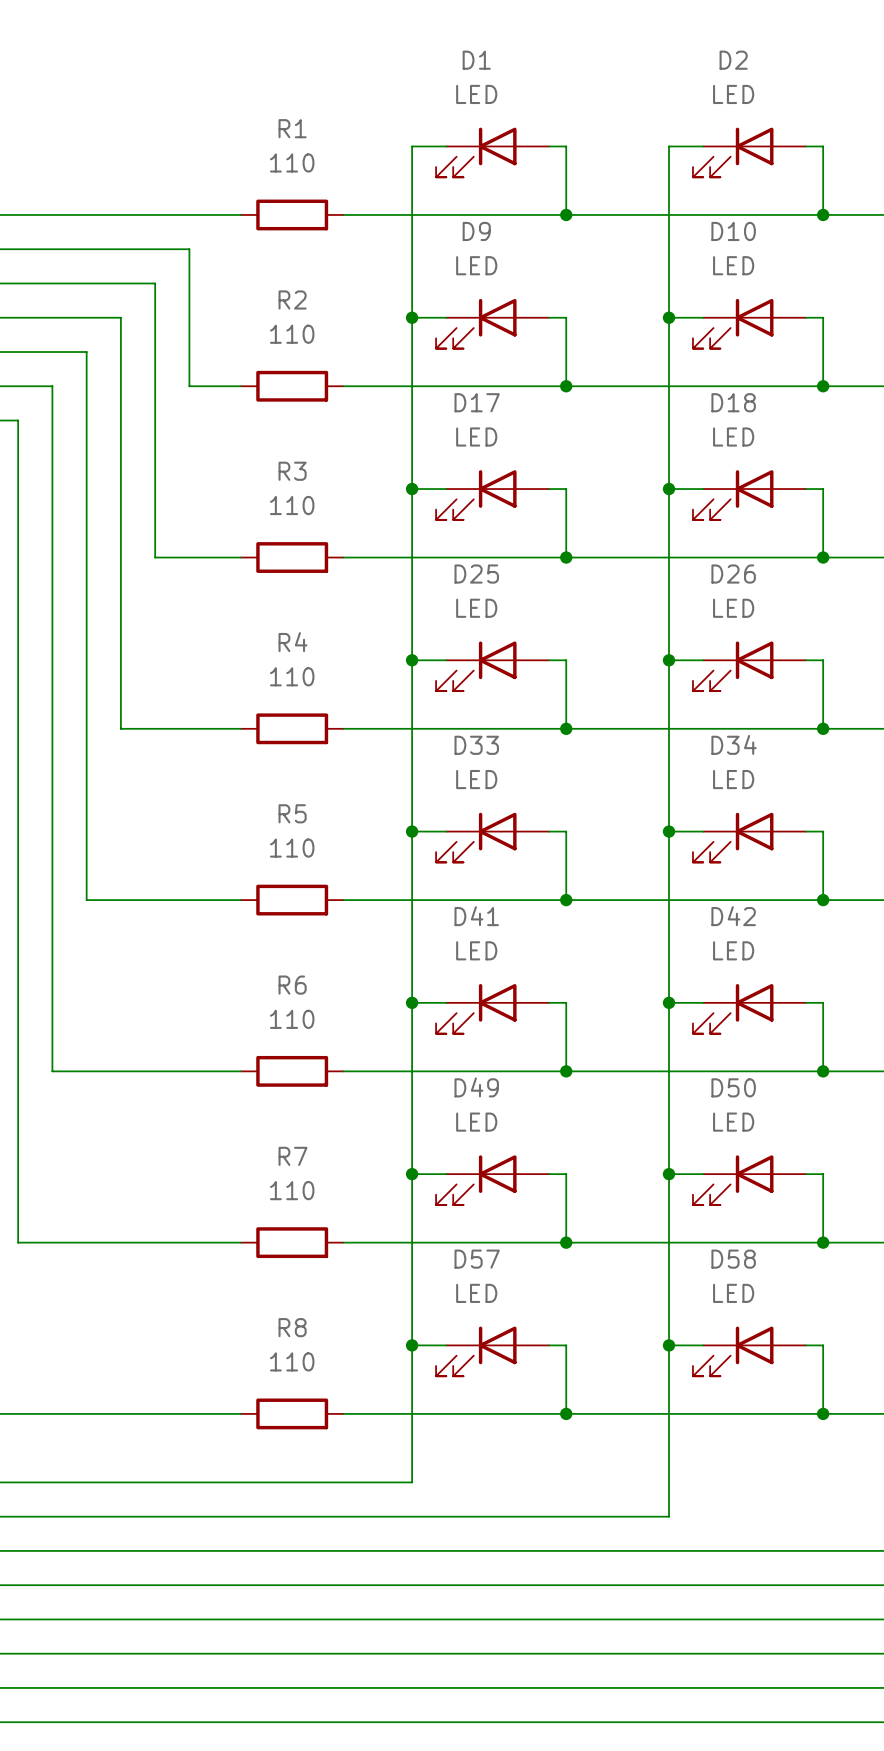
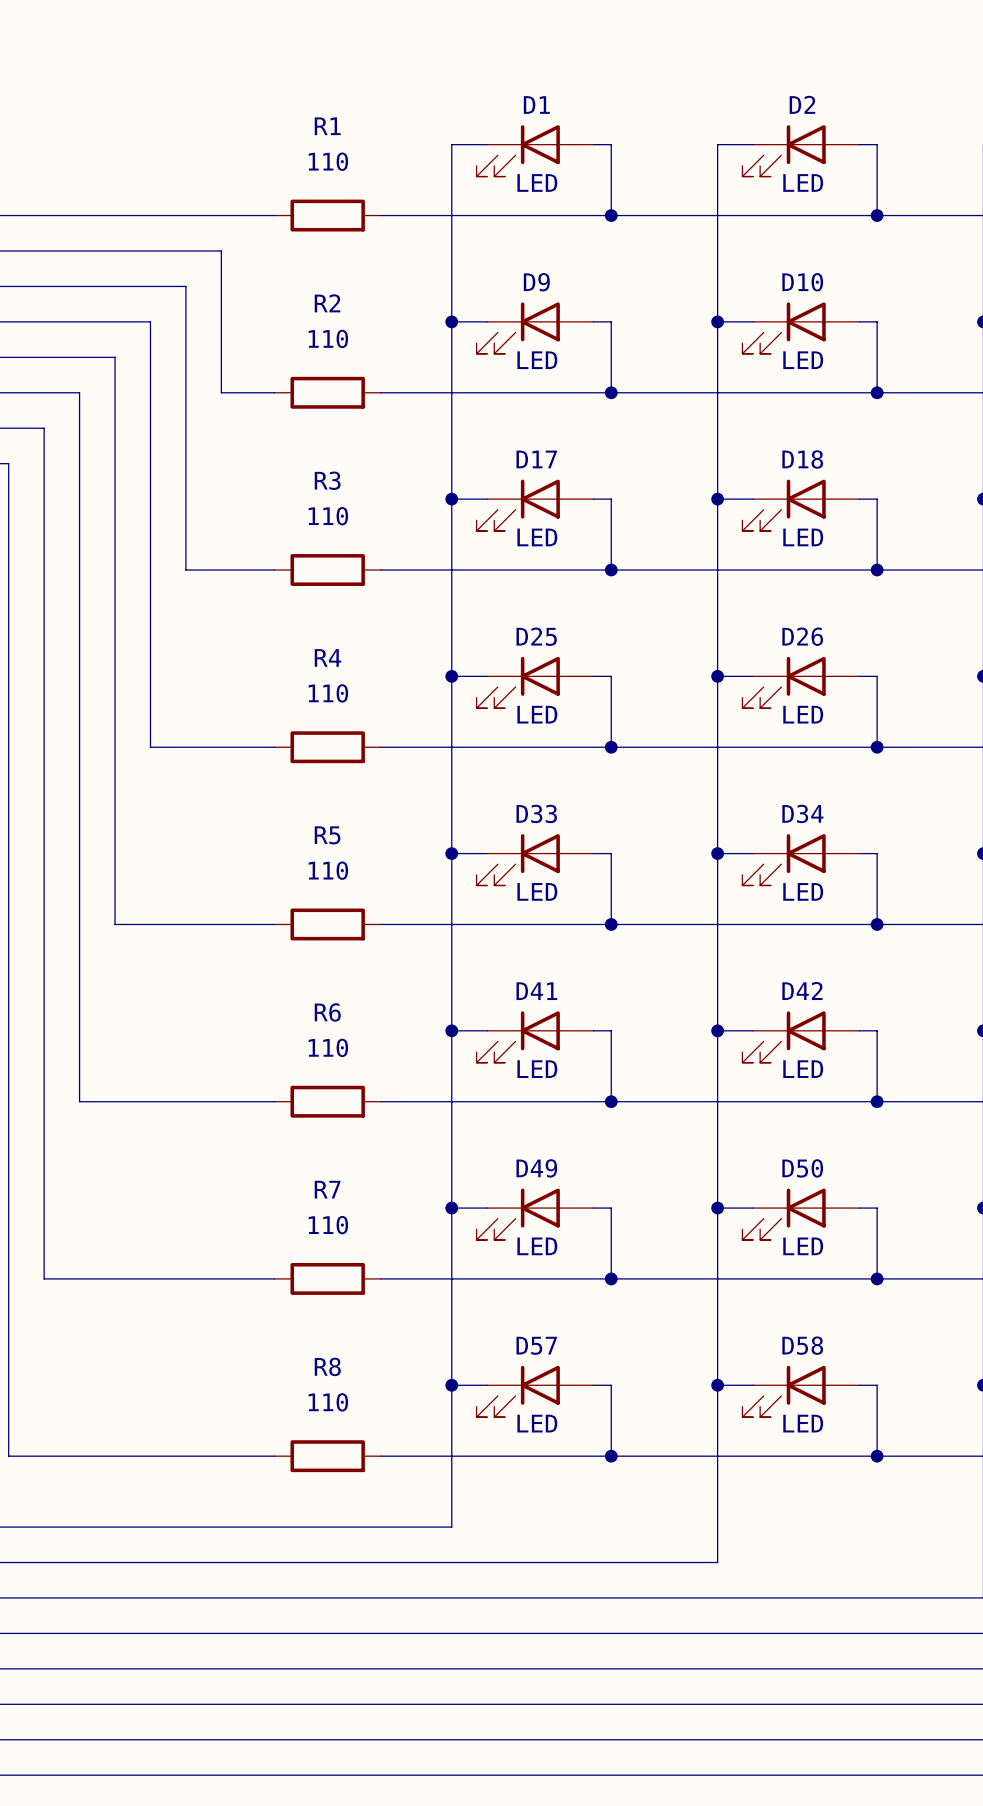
D1 name position: D1 (476, 60) -> D1 (536, 105)
D2 name position: D2 (733, 60) -> D2 (802, 104)
D1 value position: LED (476, 94) -> LED (537, 182)
D2 value position: LED (733, 94) -> LED (803, 182)
D9 name position: D9 (476, 231) -> D9 (536, 282)
D10 name position: D10 (733, 231) -> D10 (802, 282)
D9 value position: LED (476, 265) -> LED (537, 360)
D10 value position: LED (733, 265) -> LED (803, 360)
D17 name position: D17 (477, 402) -> D17 (536, 459)
D18 name position: D18 (733, 402) -> D18 (802, 459)
D17 value position: LED (476, 437) -> LED (537, 537)
D18 value position: LED (733, 437) -> LED (803, 537)
D25 name position: D25 (476, 574) -> D25 (536, 636)
D26 name position: D26 (733, 574) -> D26 (802, 636)
D25 value position: LED (476, 608) -> LED (537, 714)
D26 value position: LED (733, 608) -> LED (803, 714)
D34 name position: D34 (734, 744) -> D34 (802, 813)
D33 name position: D33 (476, 745) -> D33 (536, 813)
D33 value position: LED (476, 779) -> LED (537, 891)
D34 value position: LED (733, 779) -> LED (803, 891)
D41 name position: D41 (476, 916) -> D41 (536, 991)
D42 name position: D42 (733, 916) -> D42 (802, 991)
D41 value position: LED (476, 950) -> LED (537, 1069)
D42 value position: LED (733, 950) -> LED (803, 1069)
D49 name position: D49 (476, 1087) -> D49 (536, 1168)
D50 name position: D50 (733, 1087) -> D50 (802, 1168)
D49 value position: LED (476, 1122) -> LED (537, 1246)
D50 value position: LED (733, 1122) -> LED (803, 1246)
D57 name position: D57 (477, 1259) -> D57 (536, 1345)
D58 name position: D58 (733, 1259) -> D58 (802, 1345)
D57 value position: LED (476, 1293) -> LED (537, 1423)
D58 value position: LED (733, 1293) -> LED (803, 1423)

